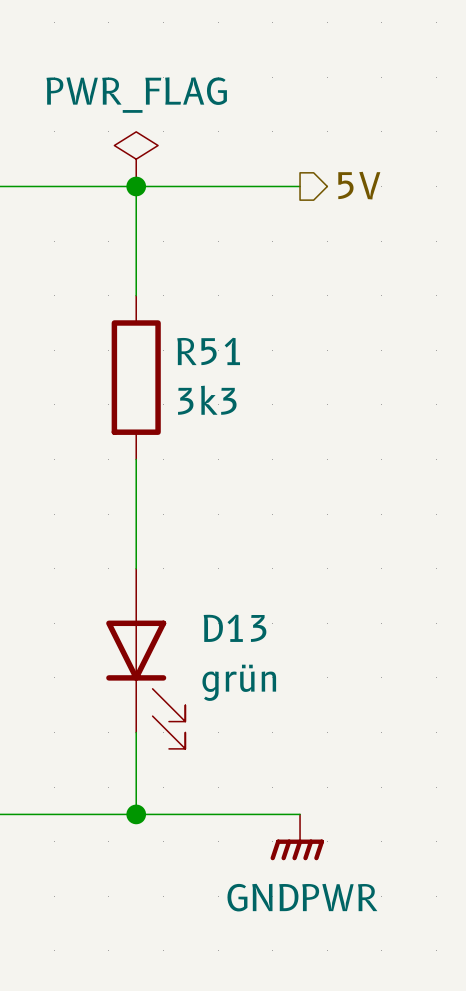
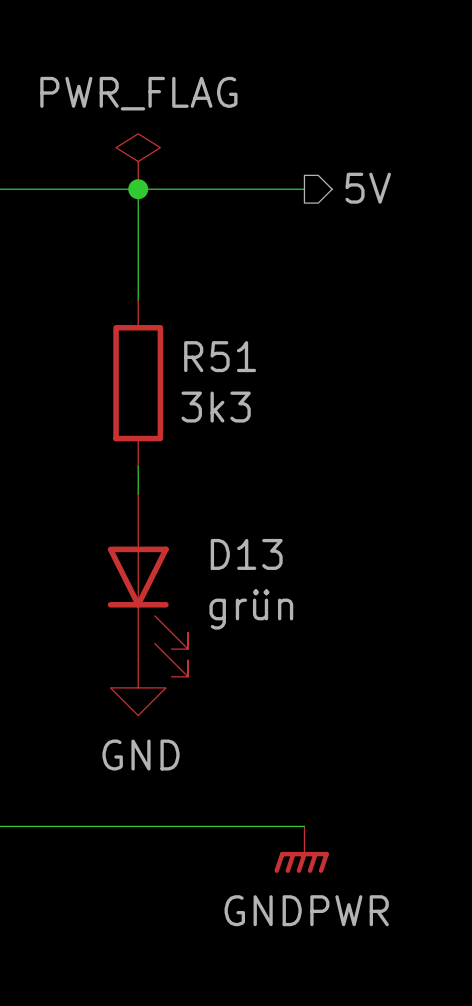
D13 position: (145, 658) -> (147, 585)
power symbol: none -> GND (138, 687)
wire: (136, 732) (136, 814) -> none
junction: (136, 814) -> none

